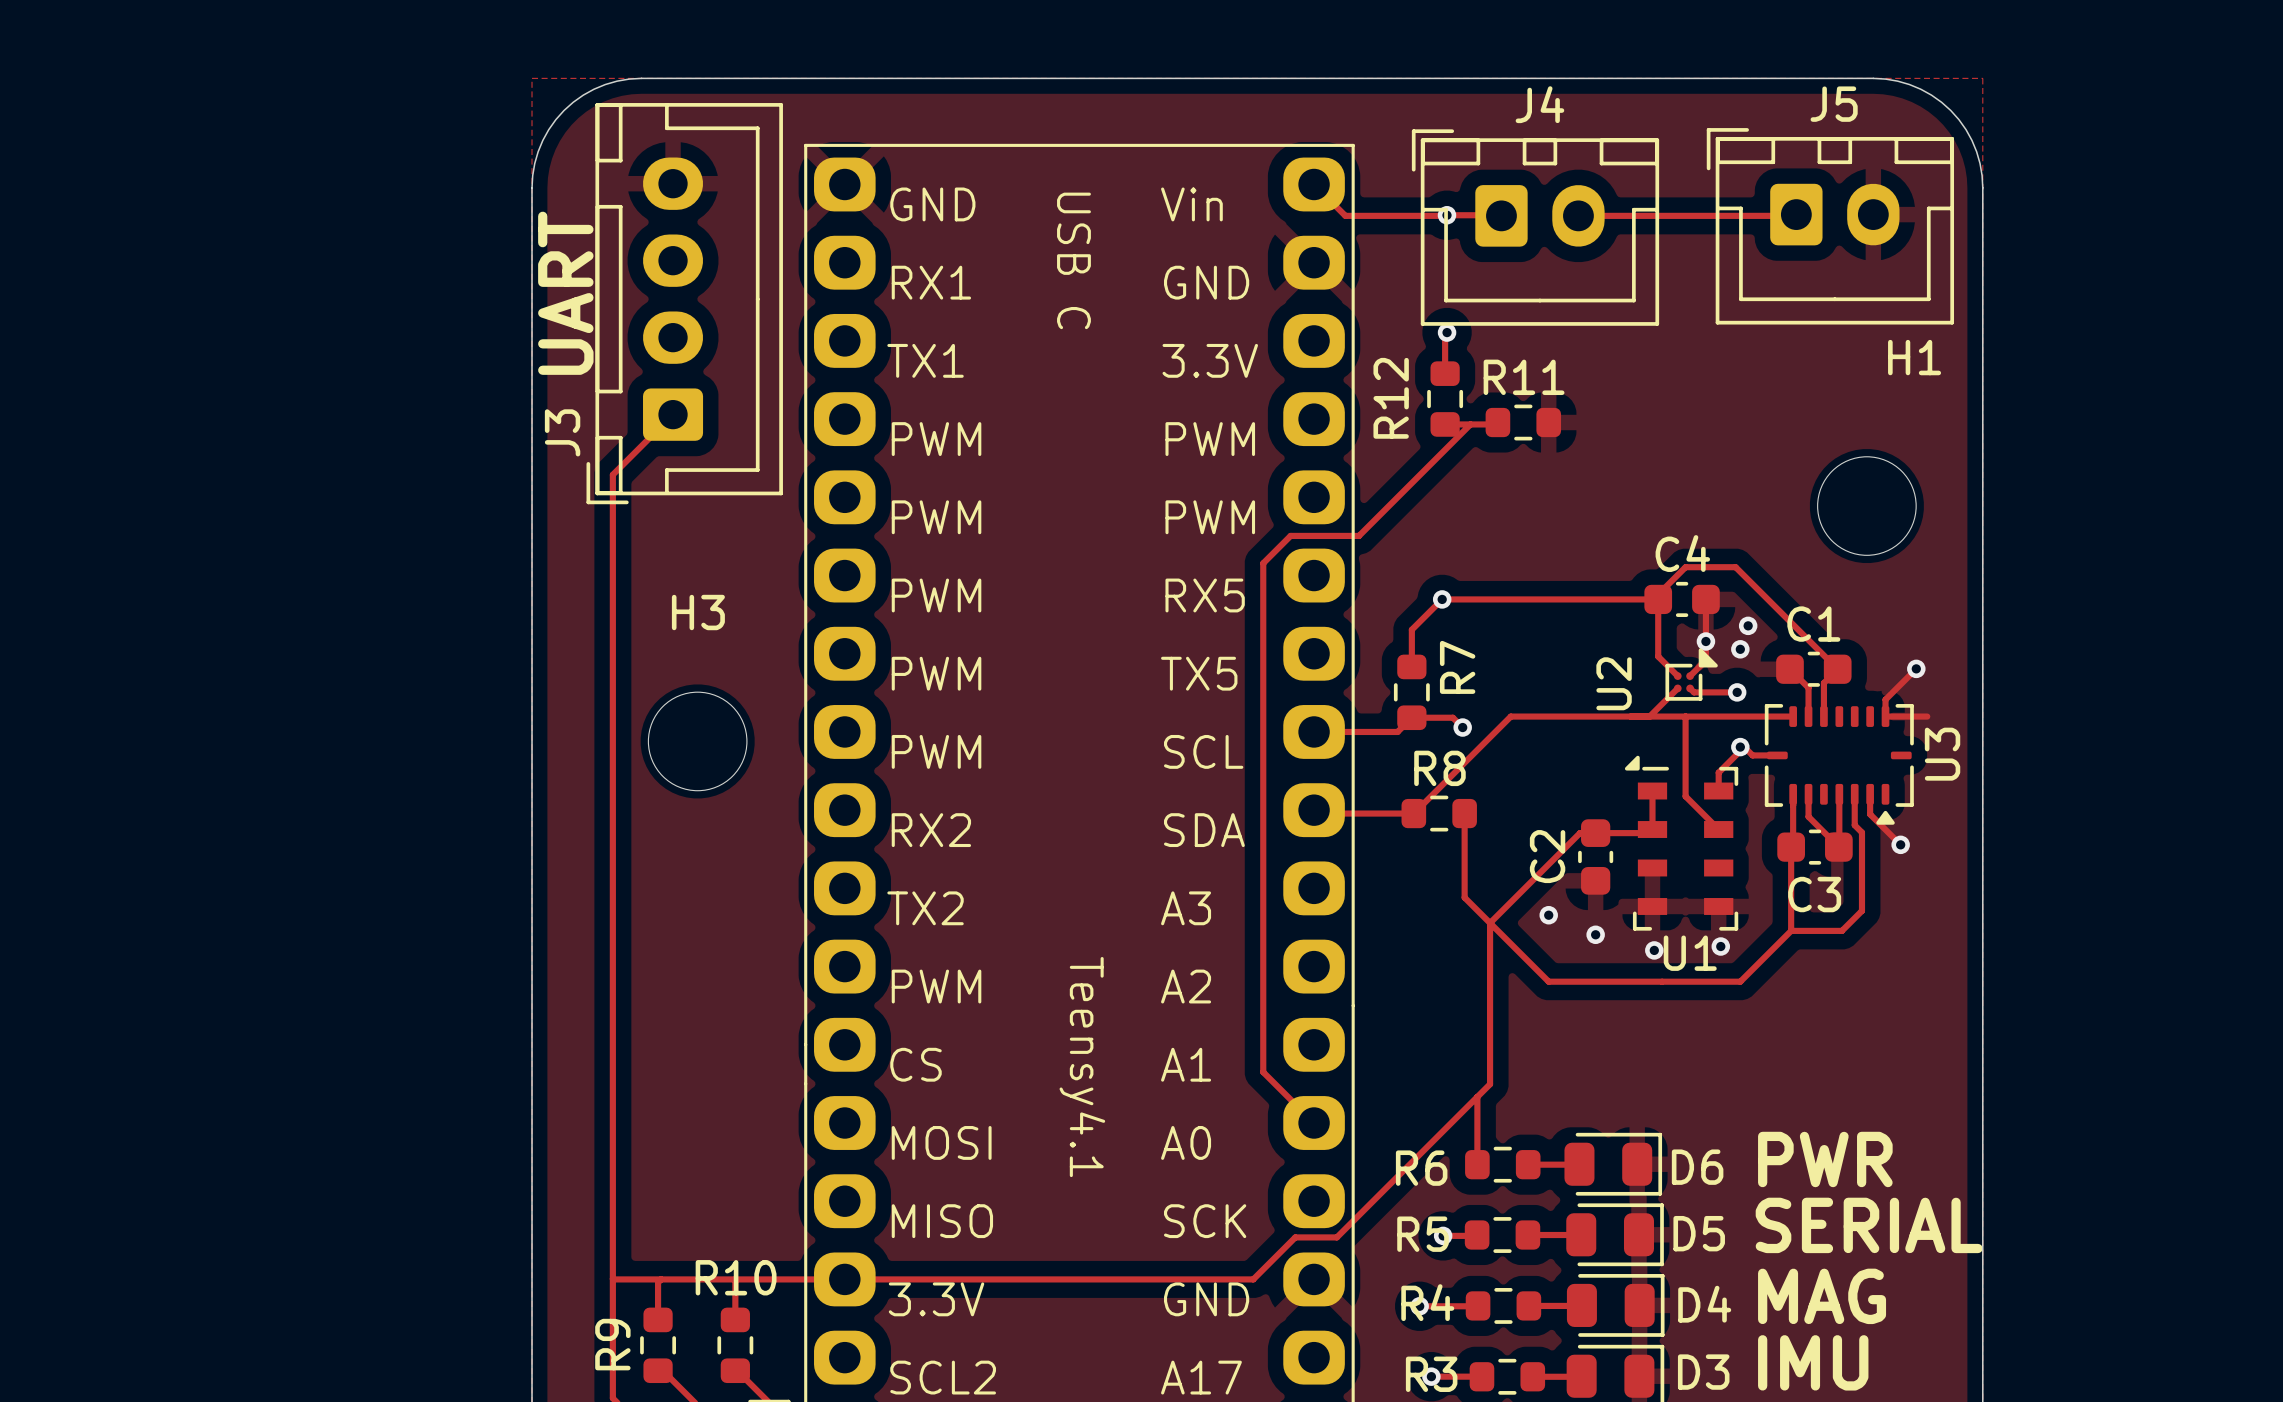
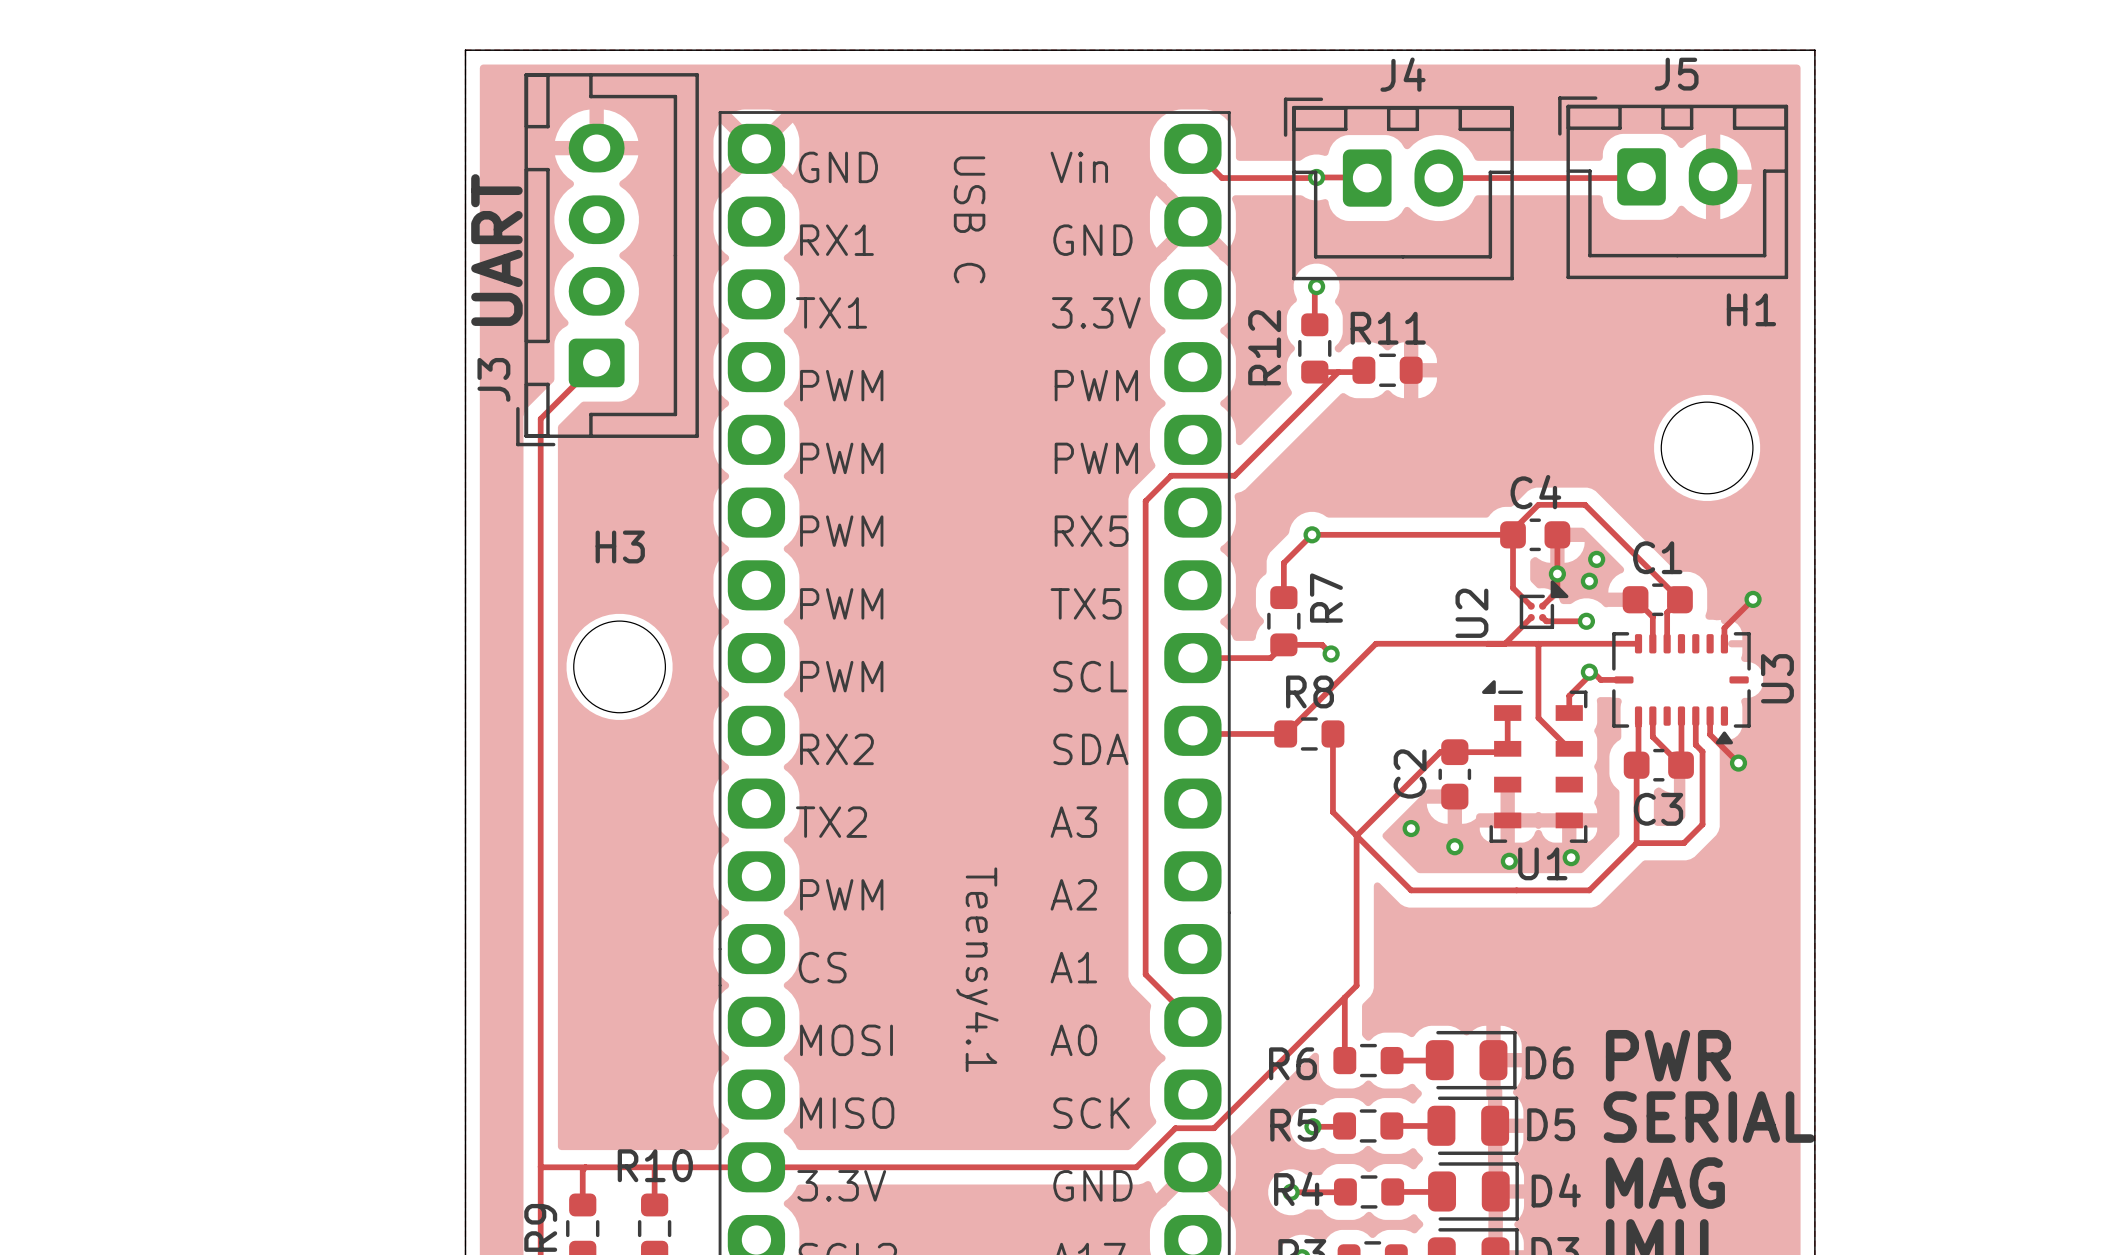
board edge: (641, 78) (617, 81) (593, 89) (564, 110) (542, 140) (534, 163) (532, 187) -> (567, 50) (465, 50) (465, 152)
board edge: (1873, 78) (1897, 81) (1920, 89) (1950, 110) (1966, 129) (1976, 151) (1982, 187) -> (1713, 50) (1814, 50) (1814, 152)
track: (1885, 716) (1927, 716) -> none

